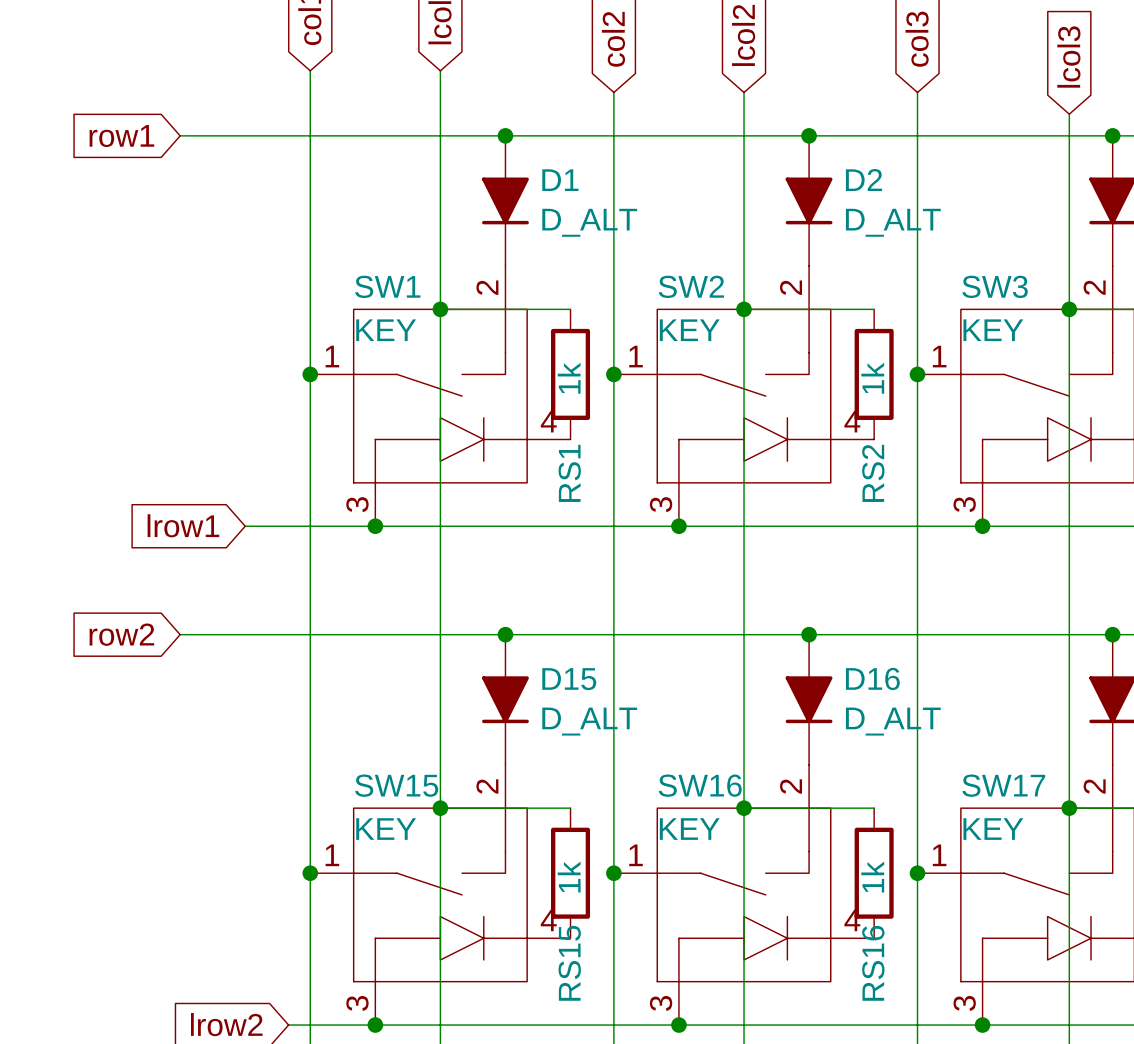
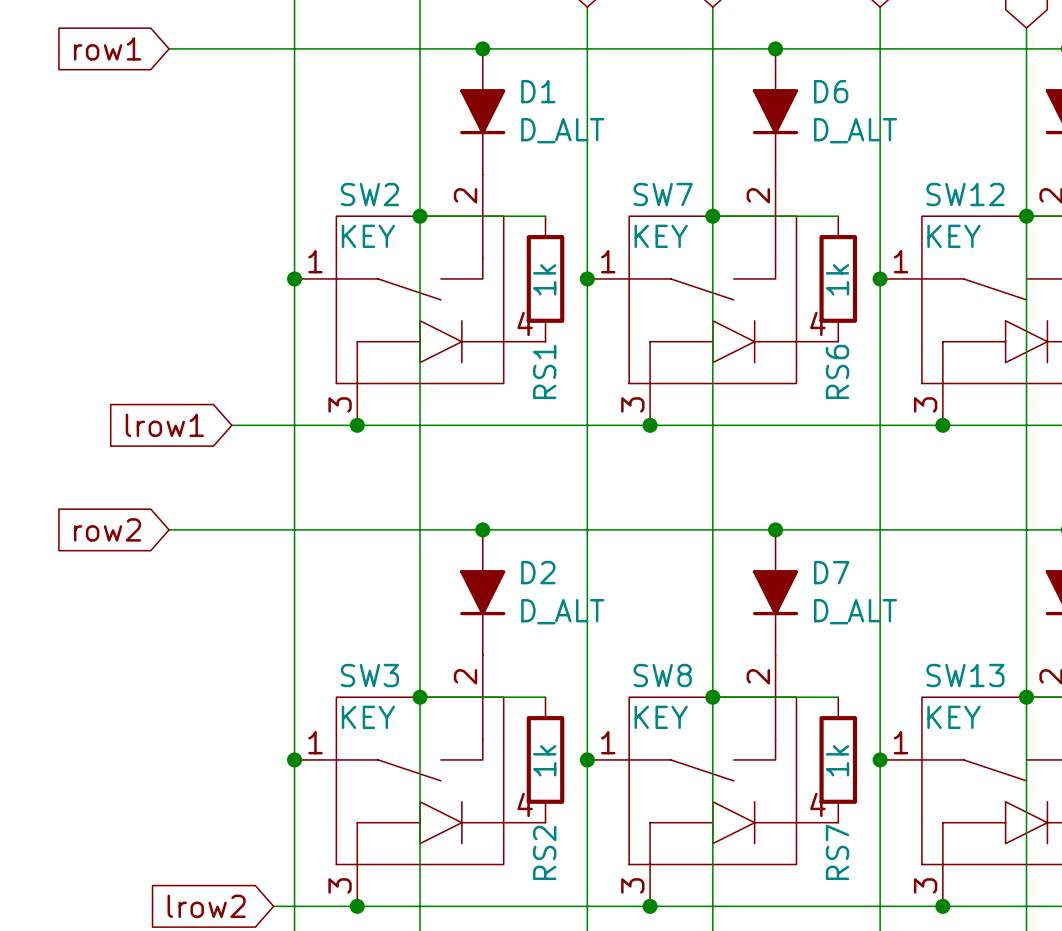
D2 name: D2 (863, 180) -> D6 (831, 91)
SW1 name: SW1 (387, 286) -> SW2 (369, 194)
SW2 name: SW2 (691, 286) -> SW7 (663, 194)
SW3 name: SW3 (995, 286) -> SW12 (965, 194)
RS2 name: RS2 (873, 473) -> RS6 (837, 371)
D16 name: D16 (872, 678) -> D7 (831, 572)
D15 name: D15 (569, 679) -> D2 (538, 572)
SW15 name: SW15 (396, 785) -> SW3 (369, 675)
SW16 name: SW16 (700, 785) -> SW8 (662, 675)
SW17 name: SW17 (1003, 785) -> SW13 (965, 675)
RS15 name: RS15 (569, 963) -> RS2 (544, 852)
RS16 name: RS16 (873, 963) -> RS7 (837, 852)

